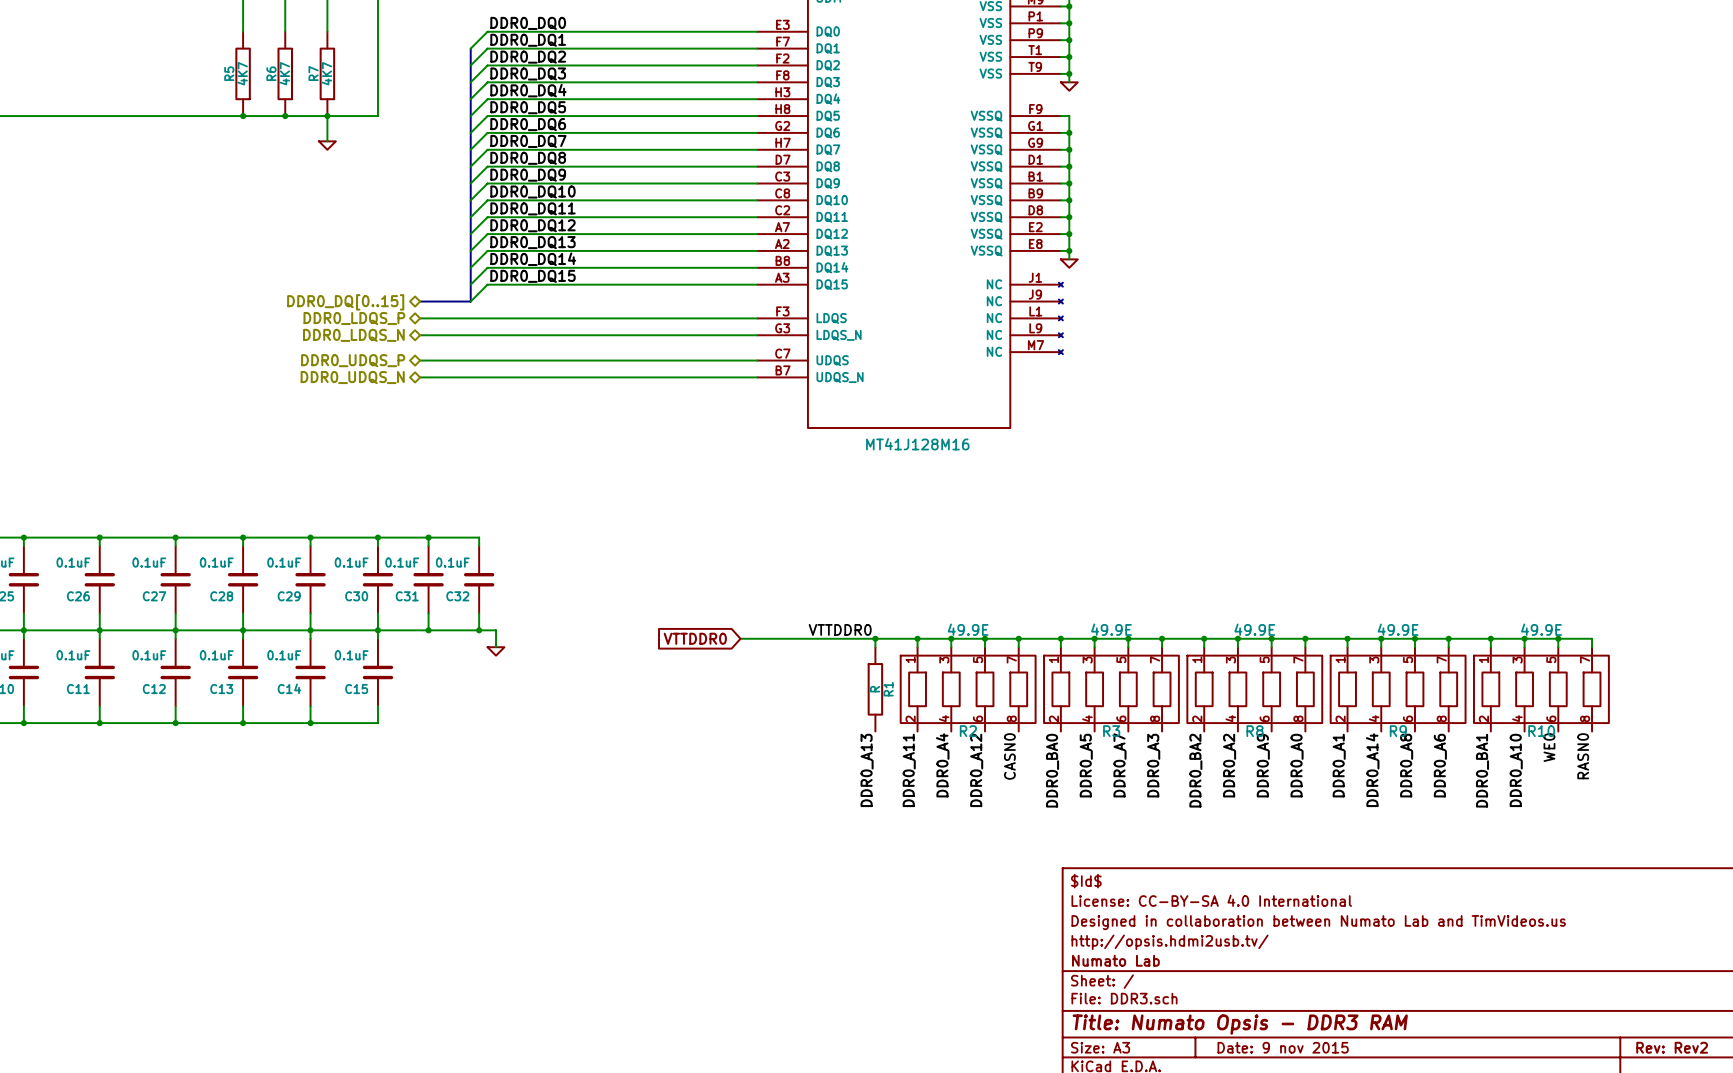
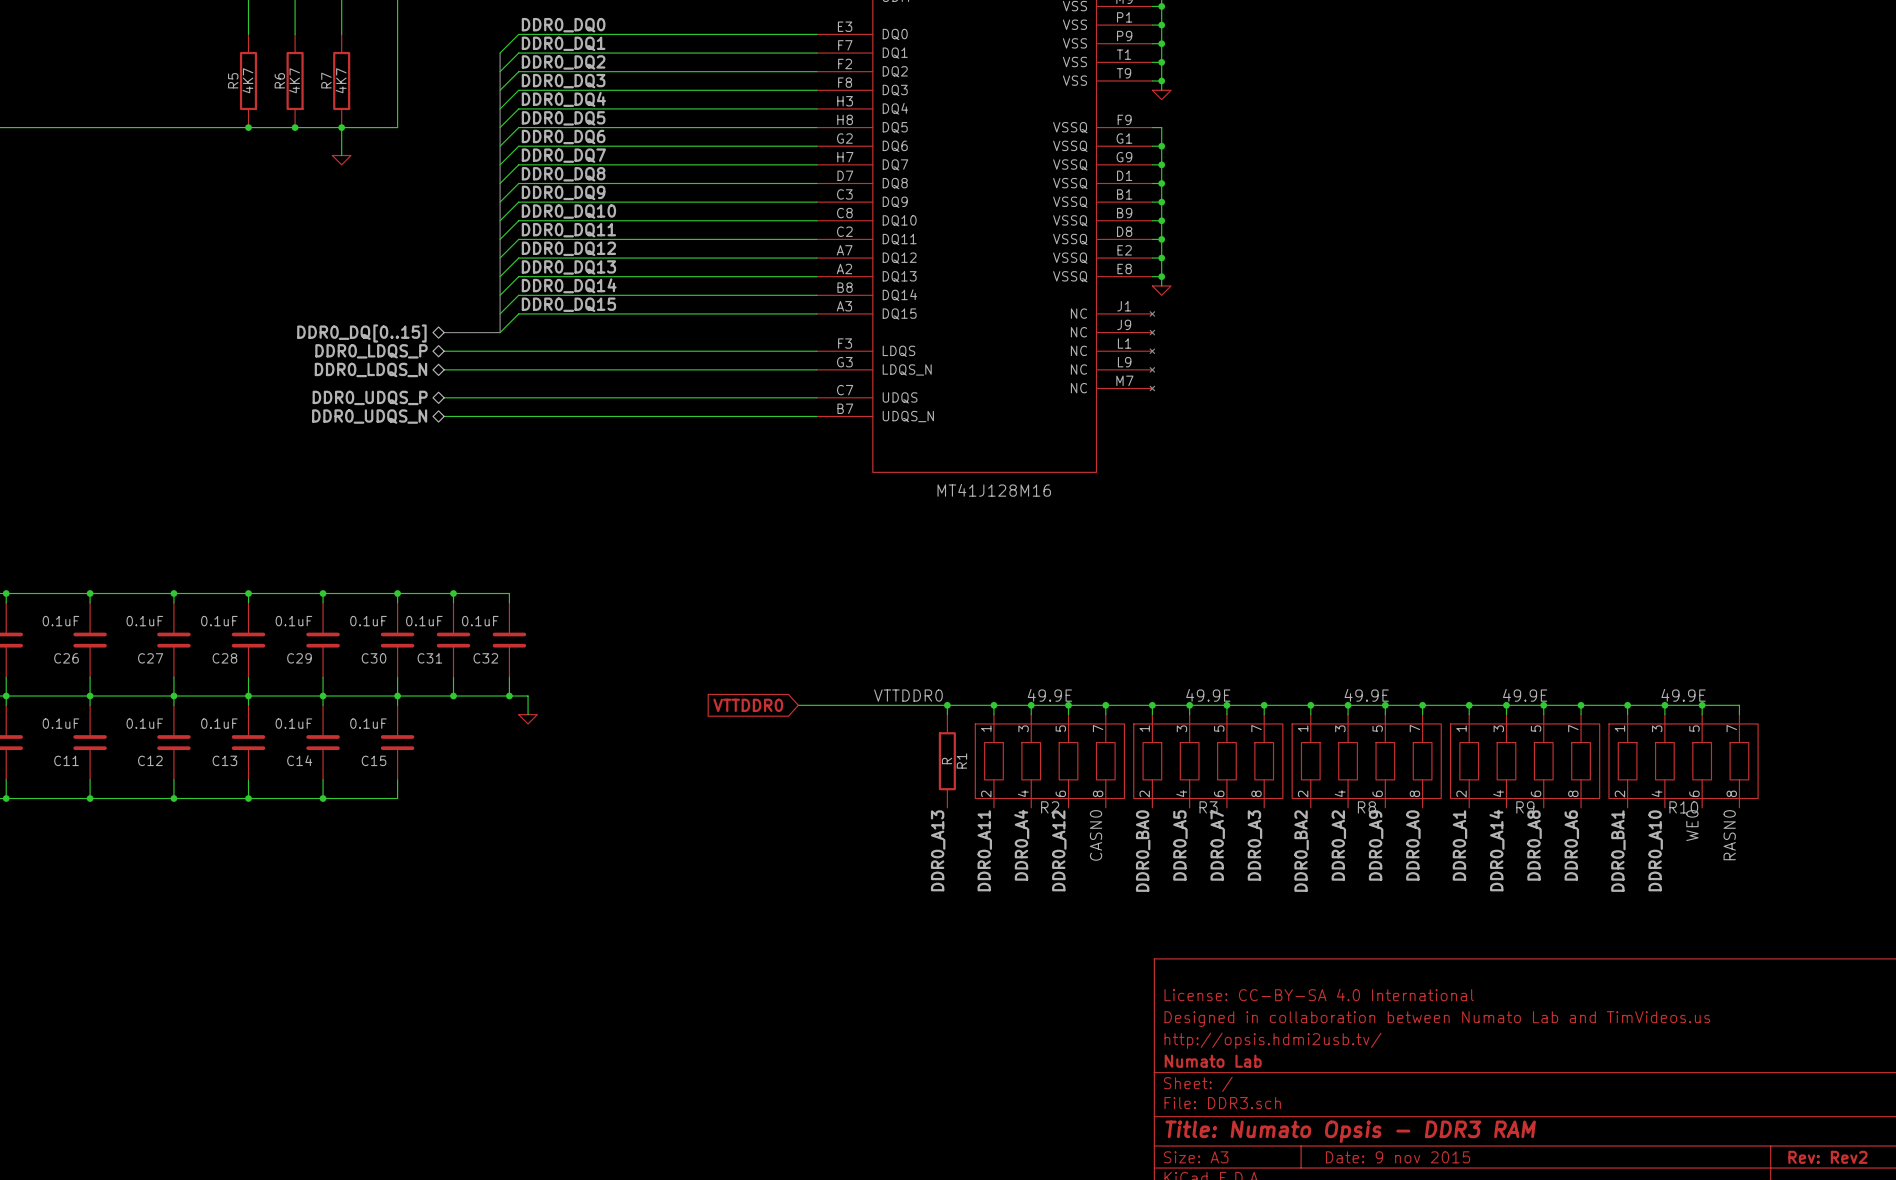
title block: $Id$ (1086, 881) -> none

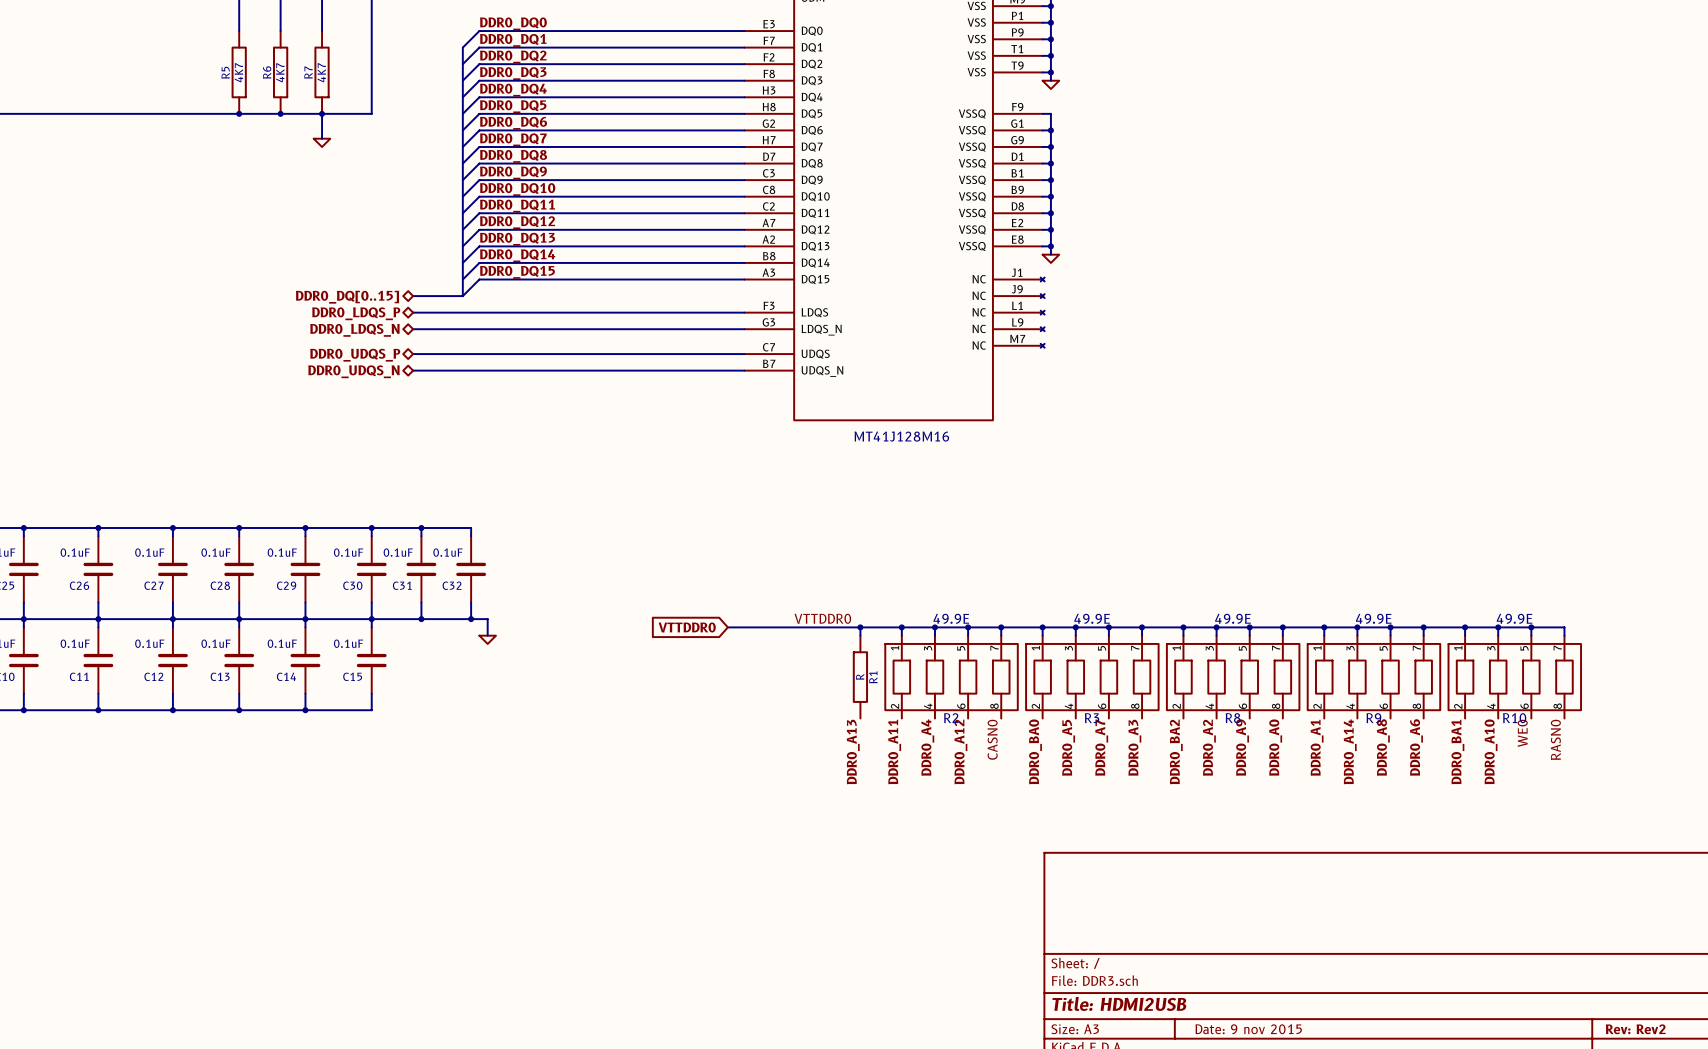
title block: License: CC-BY-SA 4.0 International (1319, 994) -> none
title block: Designed in collaboration between Numato Lab and TimVideos.us (1437, 1019) -> none
title block: http://opsis.hdmi2usb.tv/ (1273, 1040) -> none
title block: Numato Lab (1213, 1061) -> none
title block: Title: Numato Opsis - DDR3 RAM (1350, 1131) -> Title: HDMI2USB (1119, 1003)

